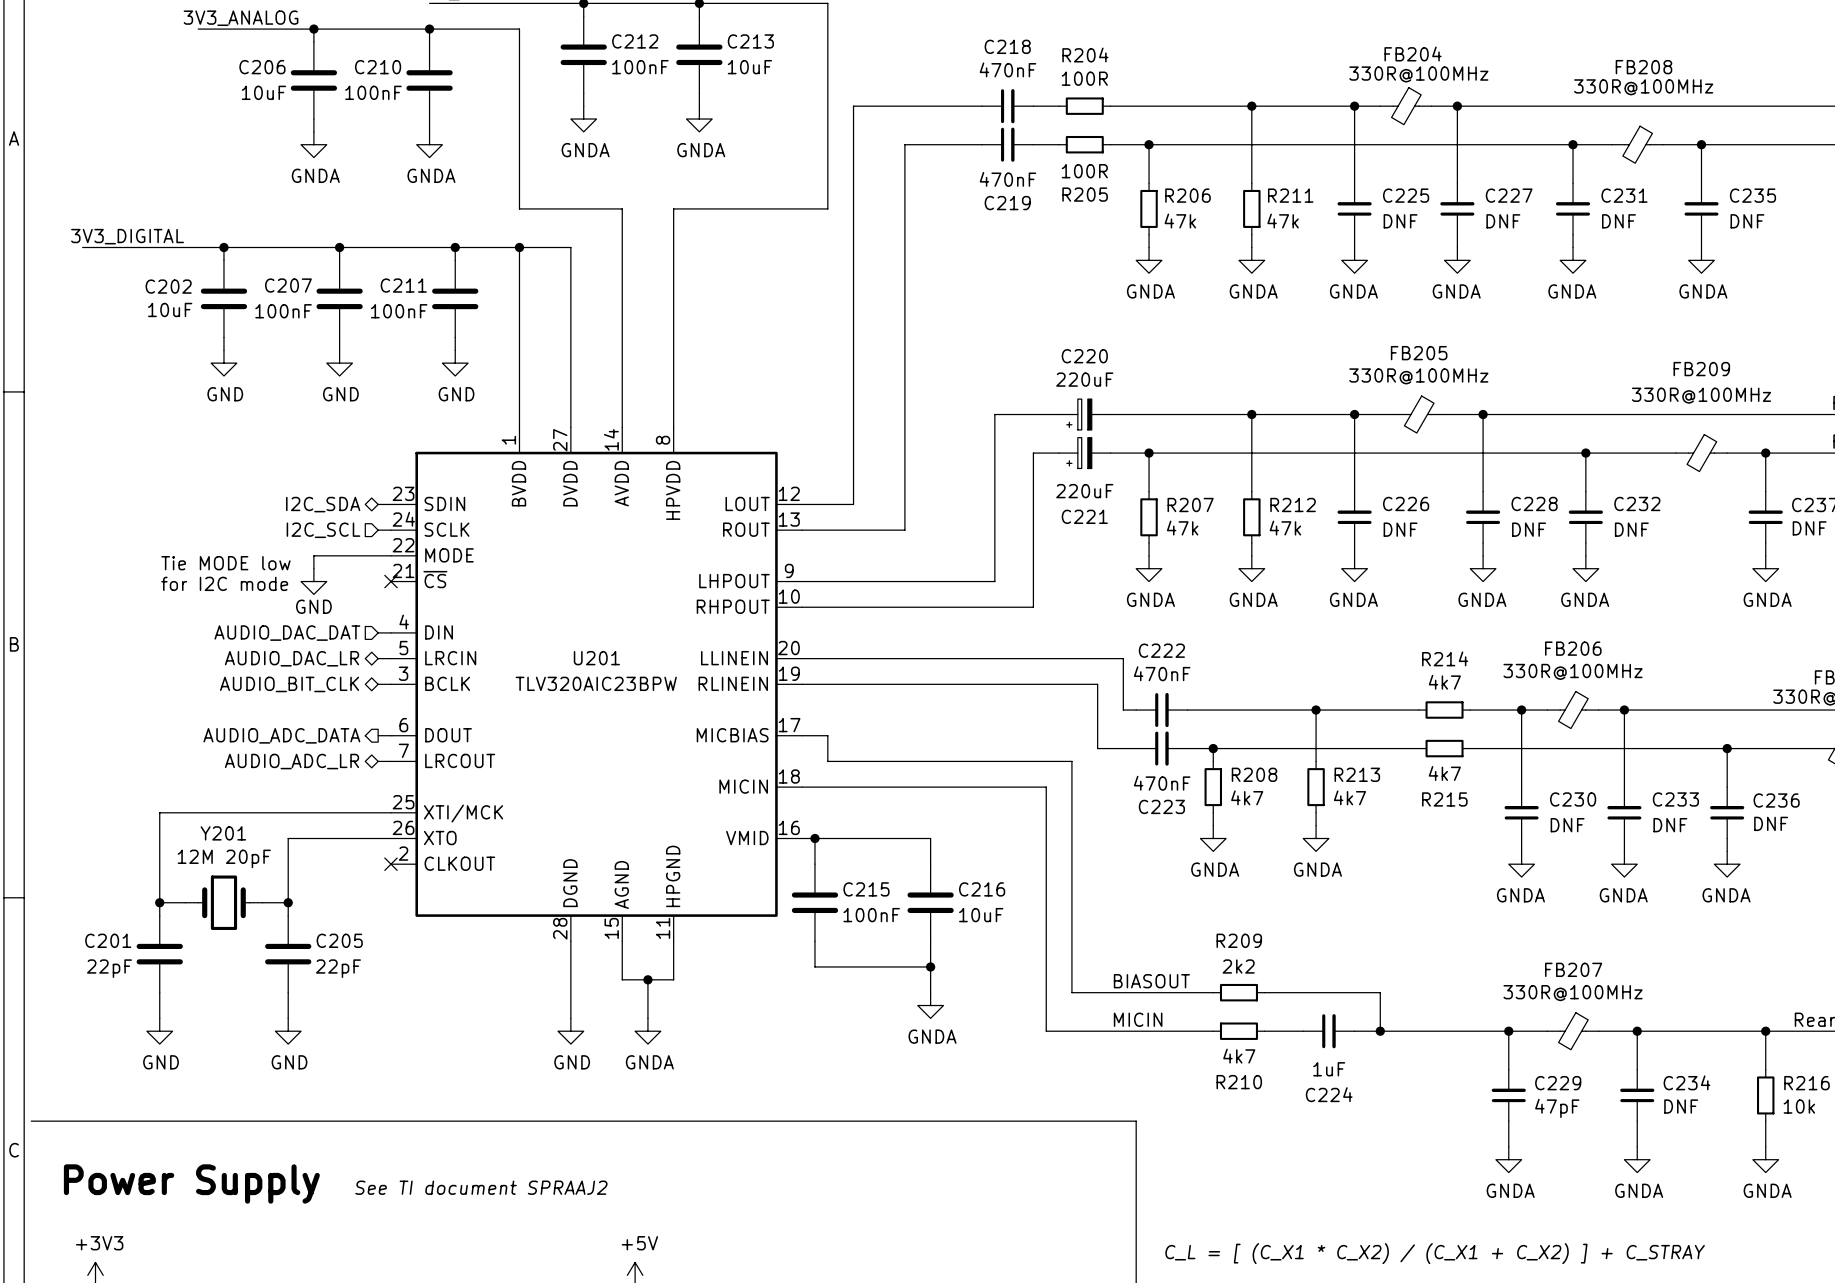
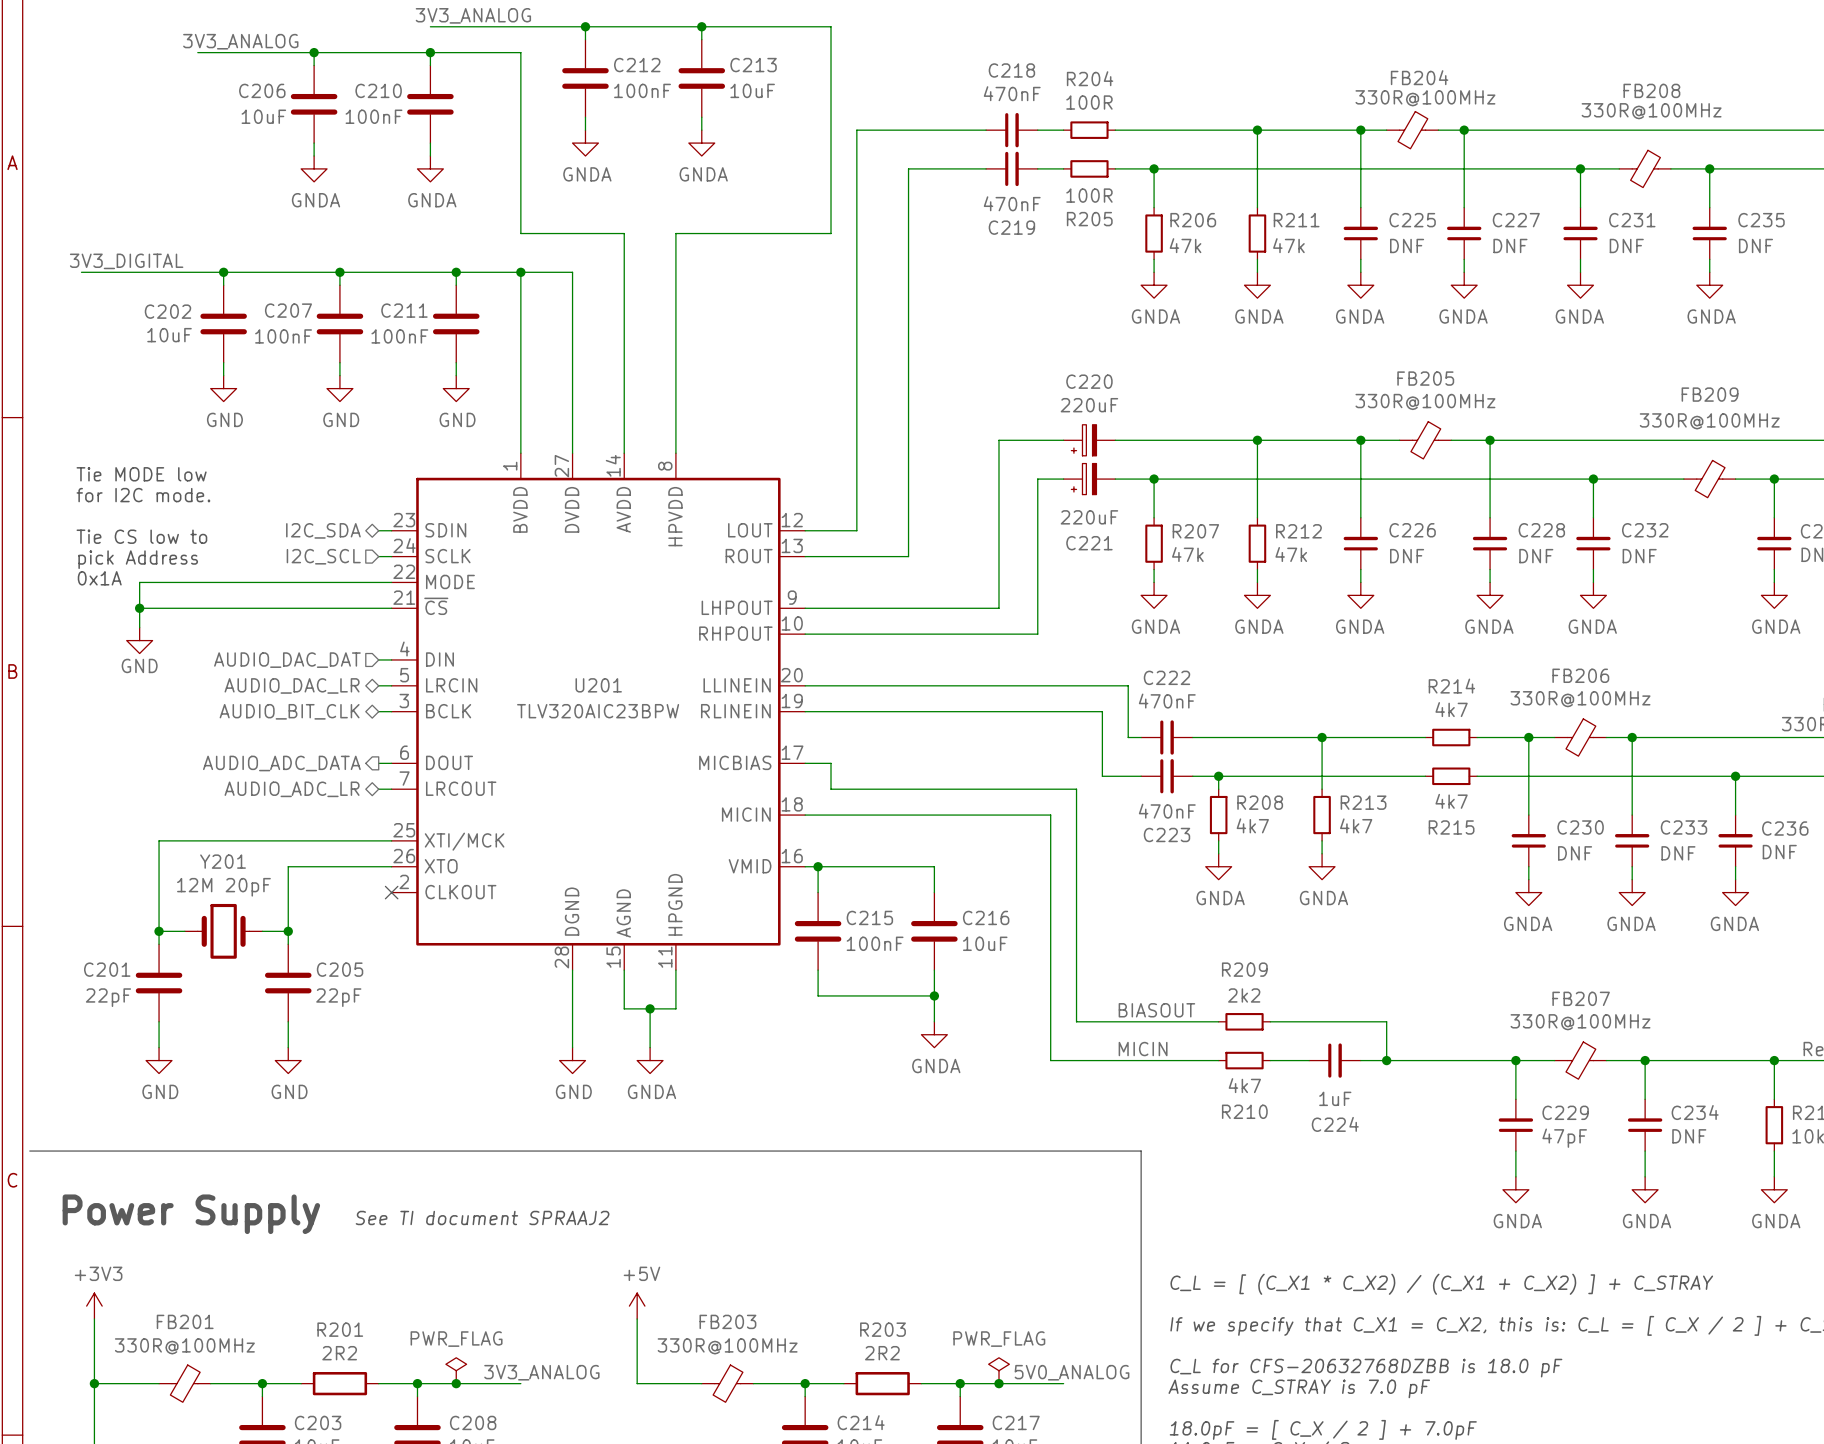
text: none -> for I2C mode. (143, 495)
text: none -> Tie CS low to (141, 536)
text: none -> pick Address (138, 559)
text: none -> 0x1A (99, 578)
wire: (313, 555) (313, 568) -> (314, 582) (139, 582) (139, 627)
text position: Tie MODE low (225, 563) -> Tie MODE low (141, 474)
wire: none -> (139, 608) (391, 608)
junction: none -> (139, 608)
power symbol position: GND (313, 581) -> GND (139, 640)
no-connect mark: (391, 581) -> none
text: for I2C mode (224, 583) -> none

